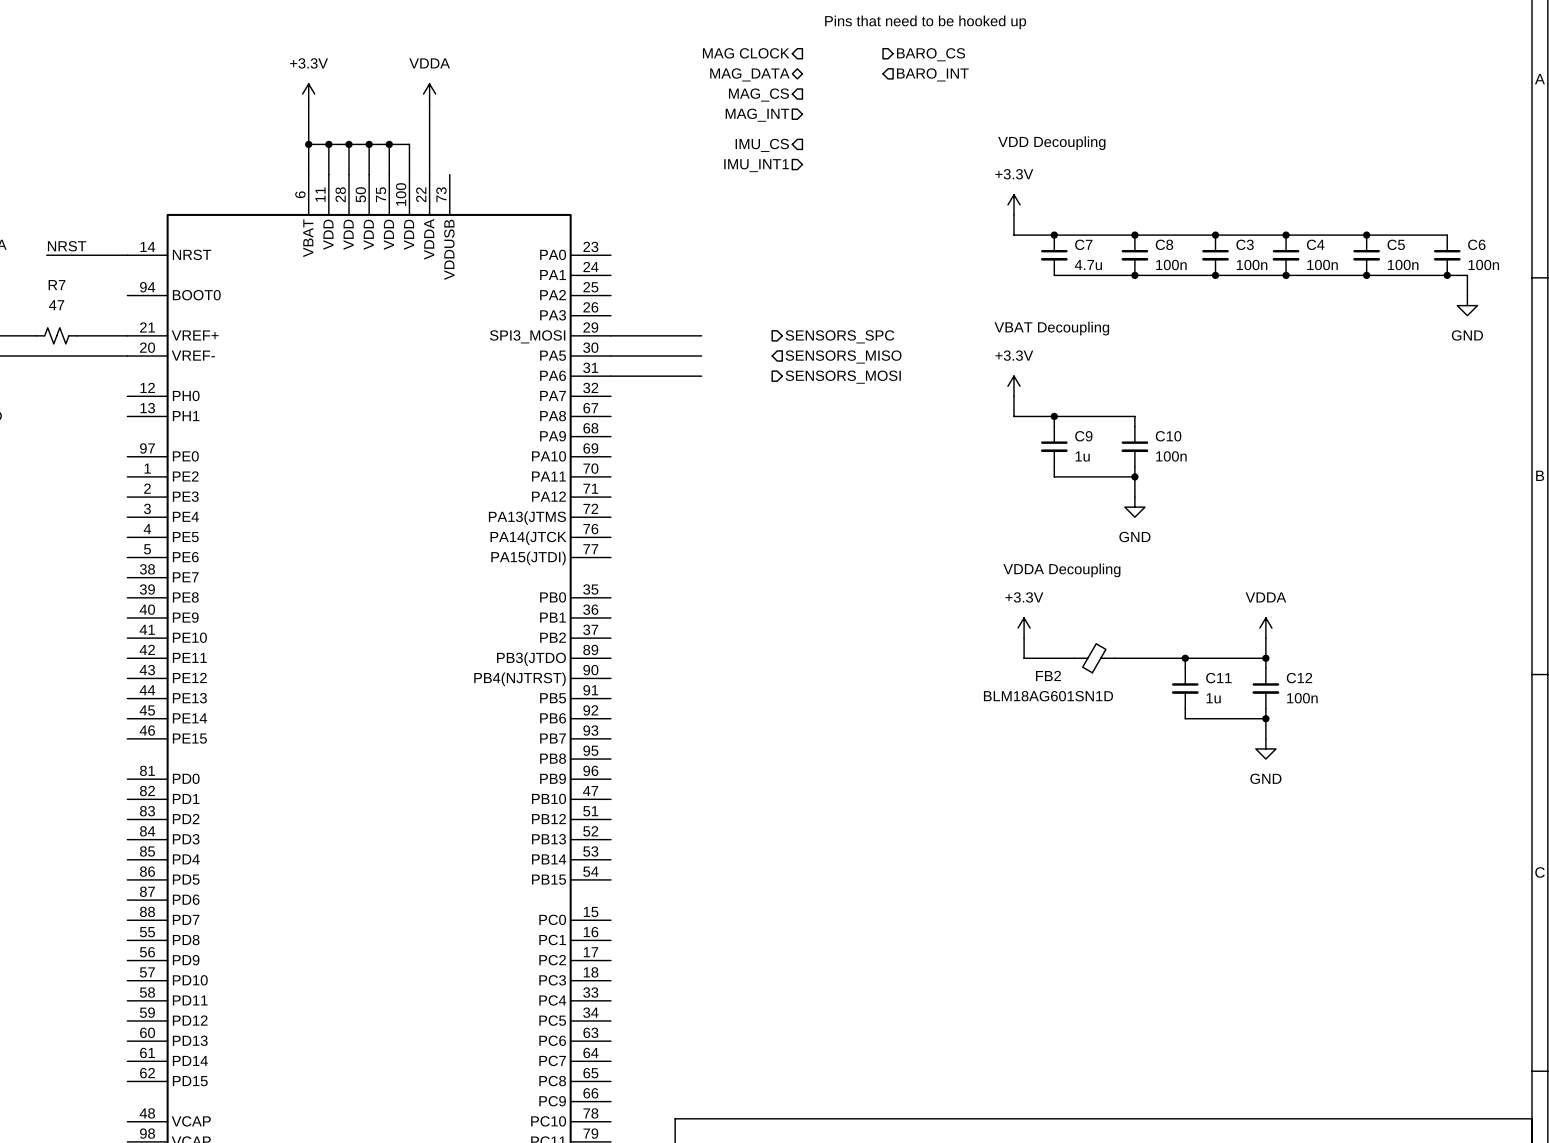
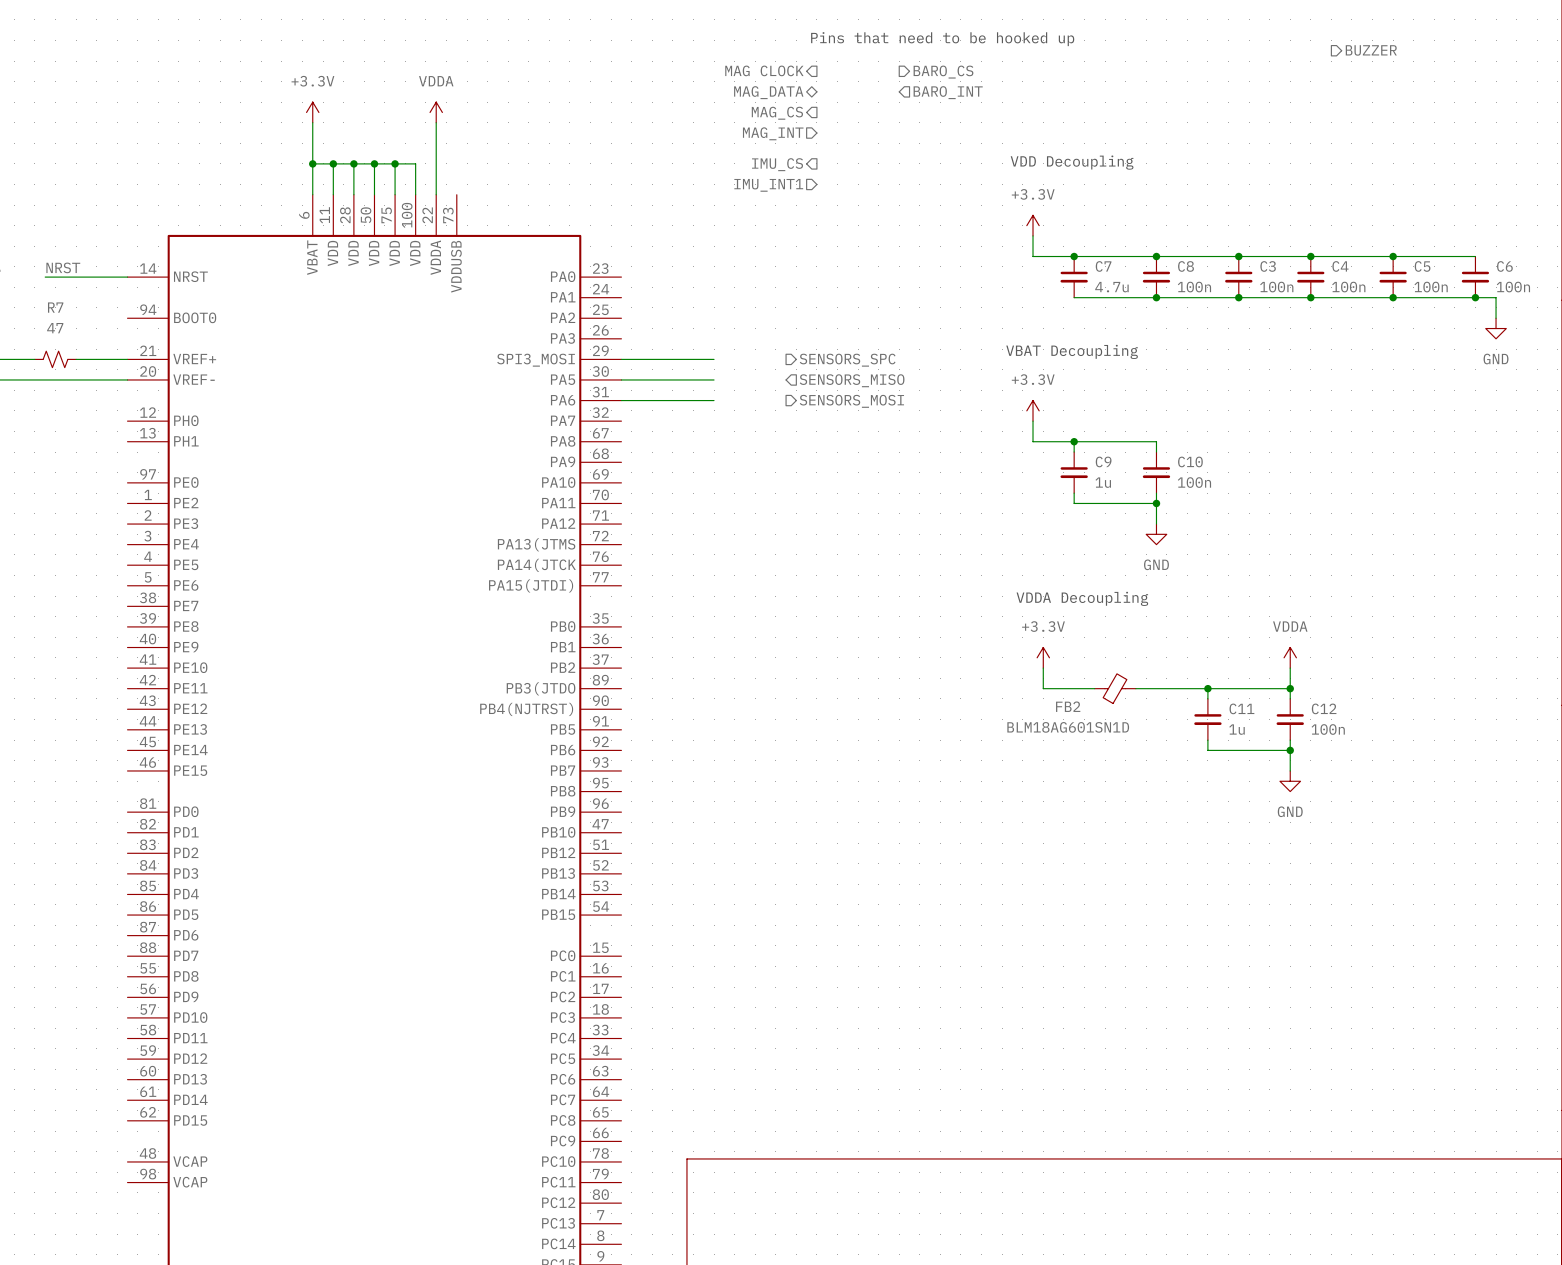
hierarchical label: none -> BUZZER (1371, 50)

